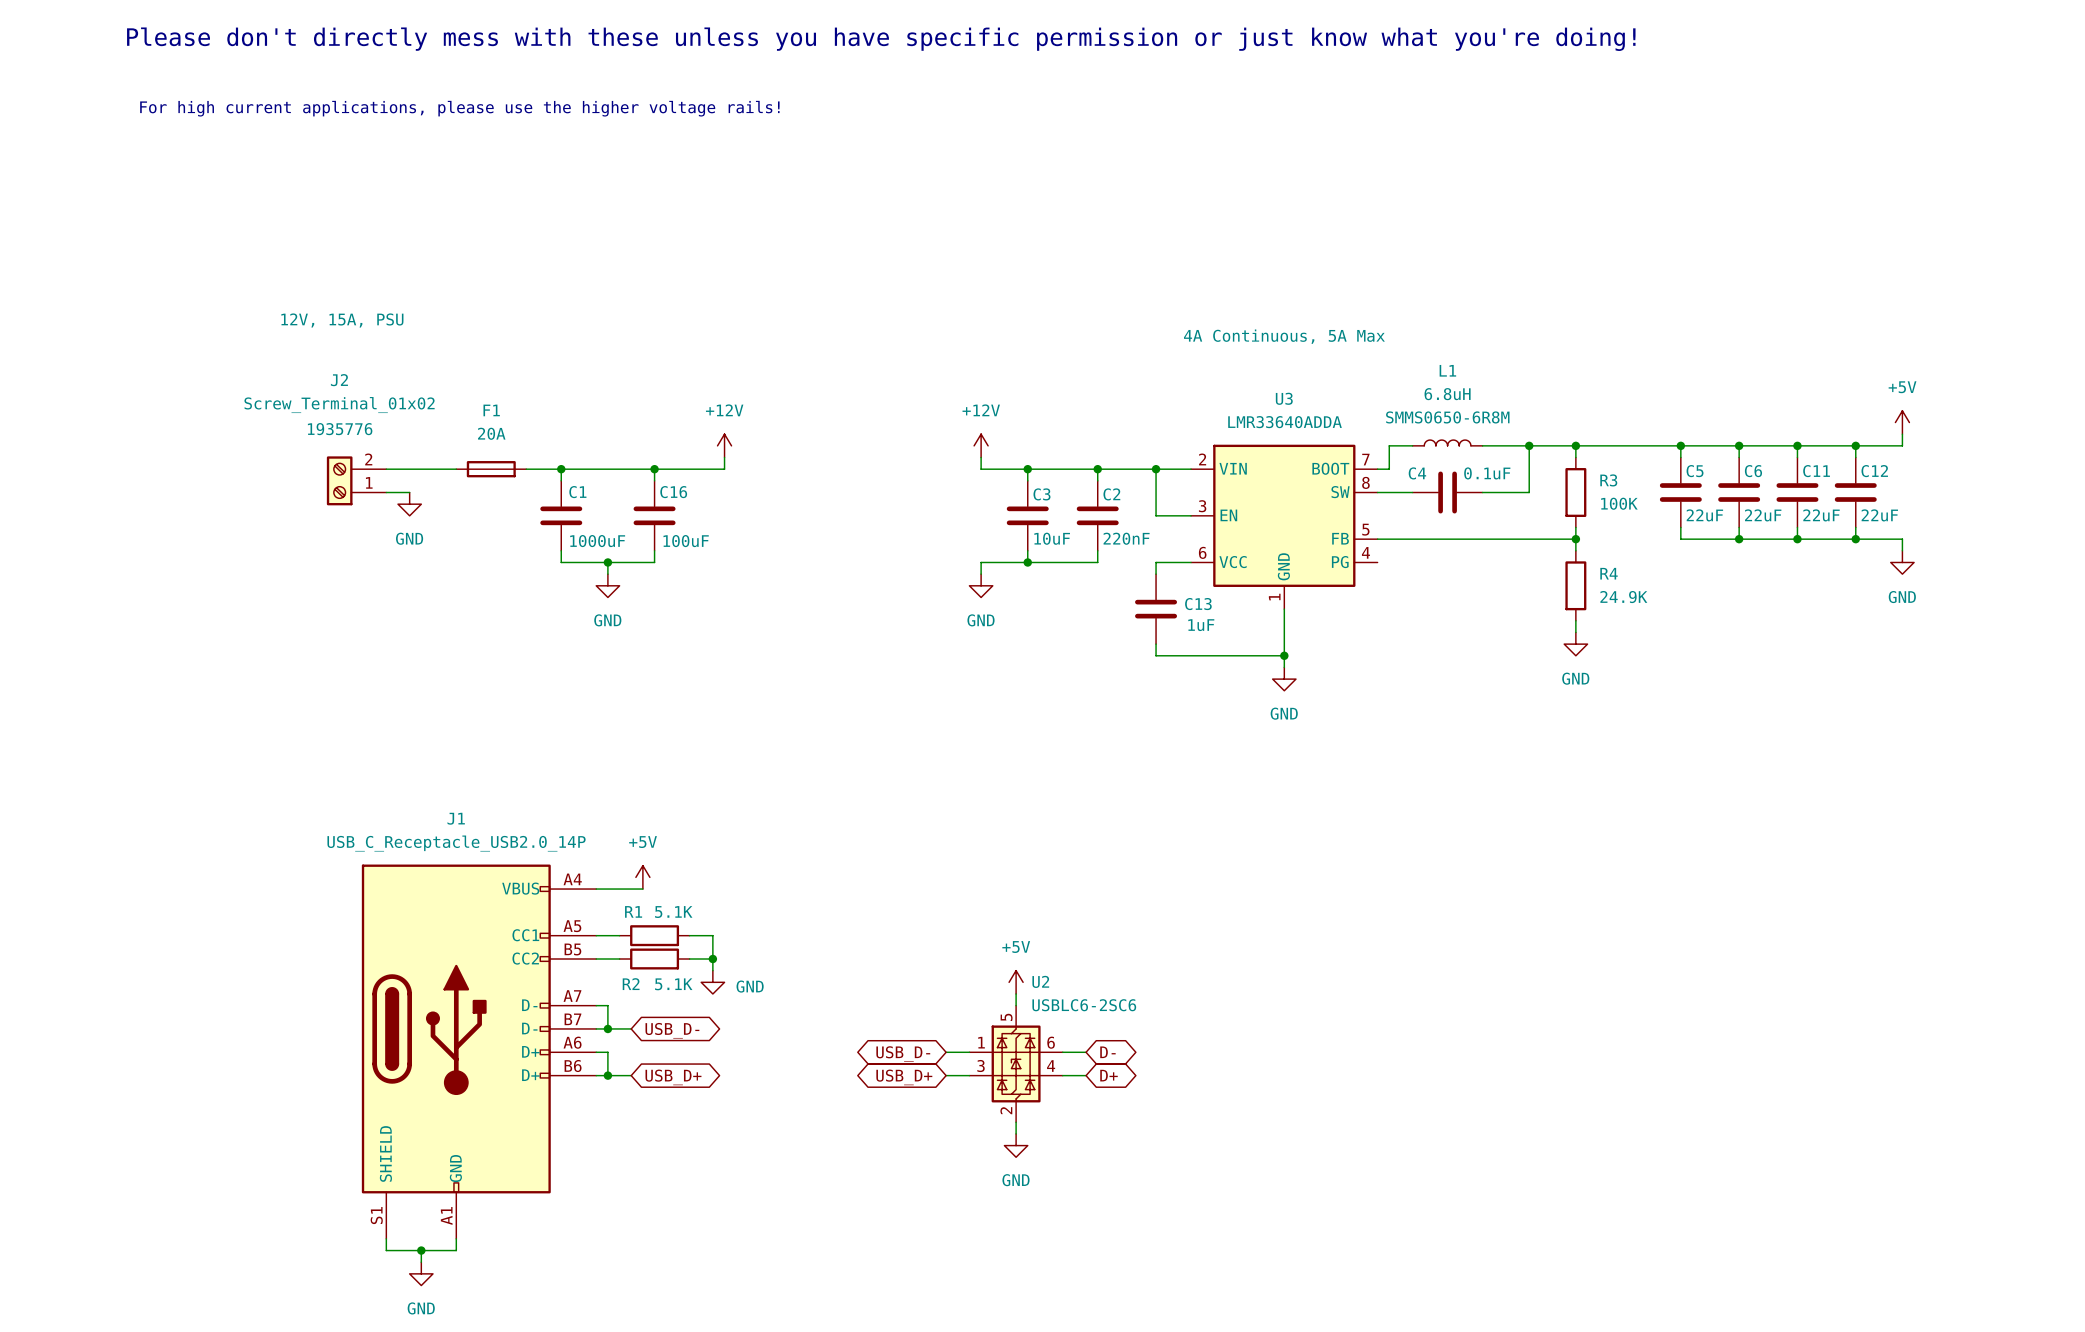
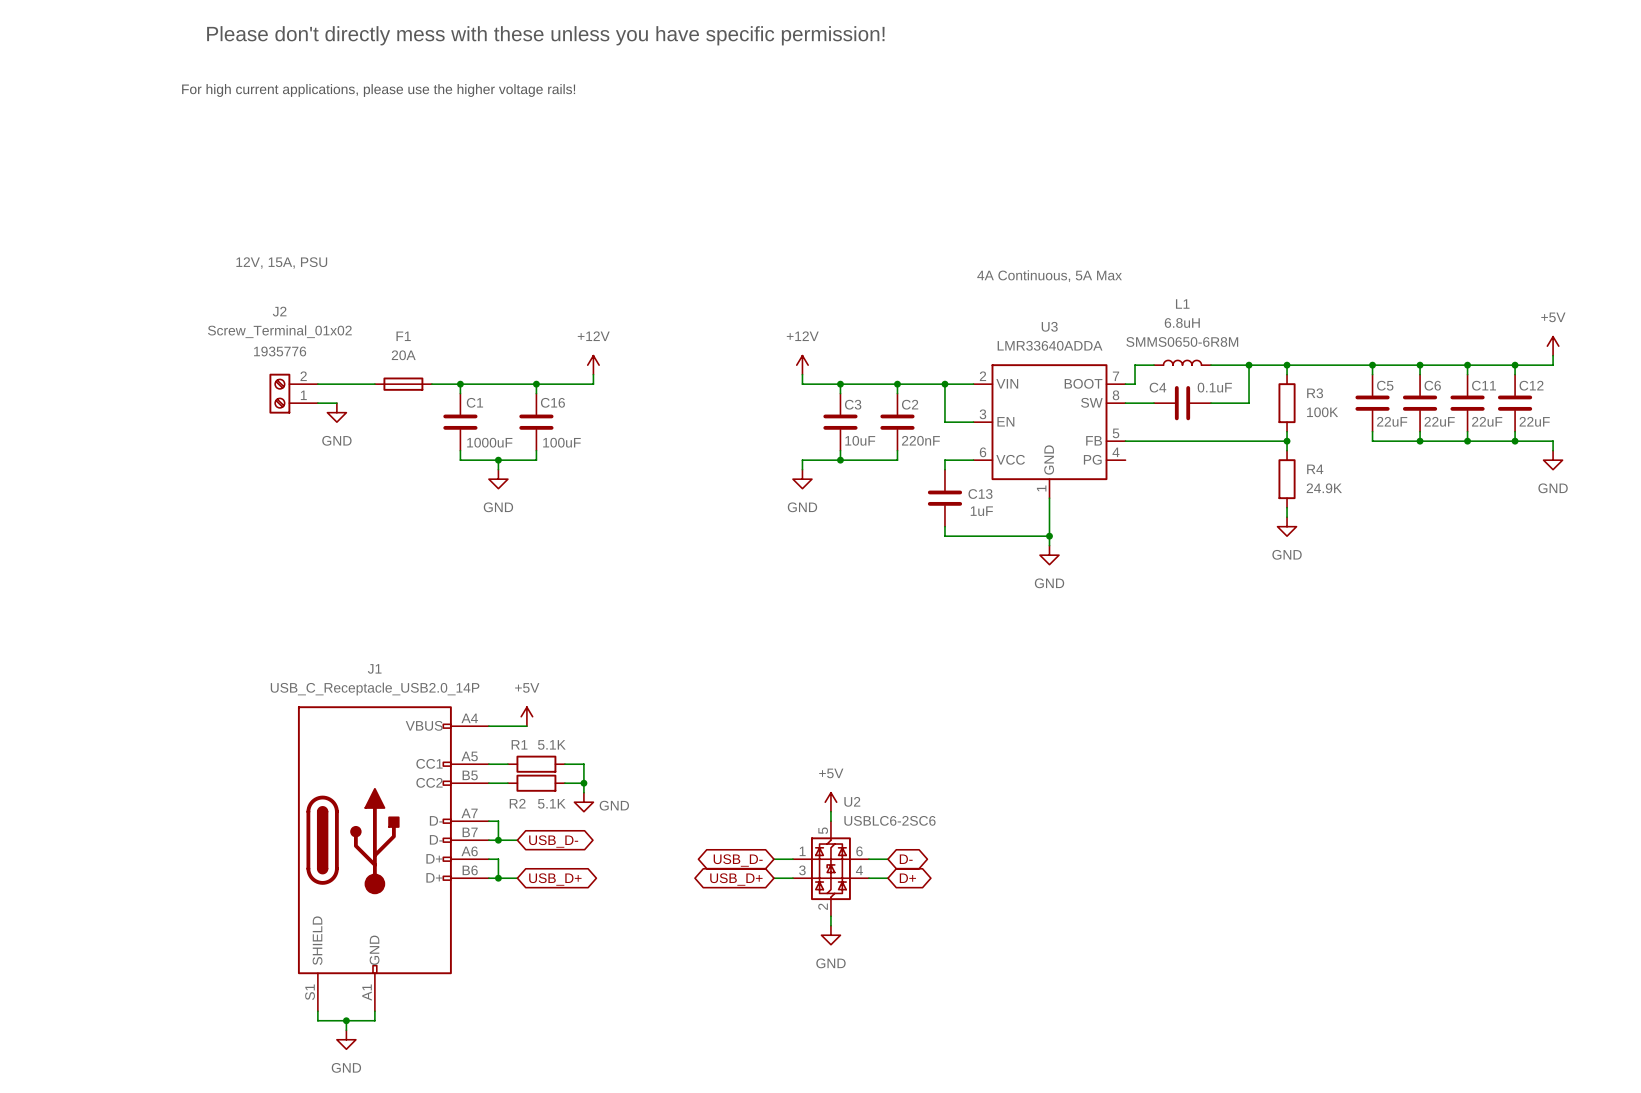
text: Please don't directly mess with these unless you have specific permission or just know what you're doing! (881, 39) -> Please don't directly mess with these unless you have specific permission! (545, 35)

